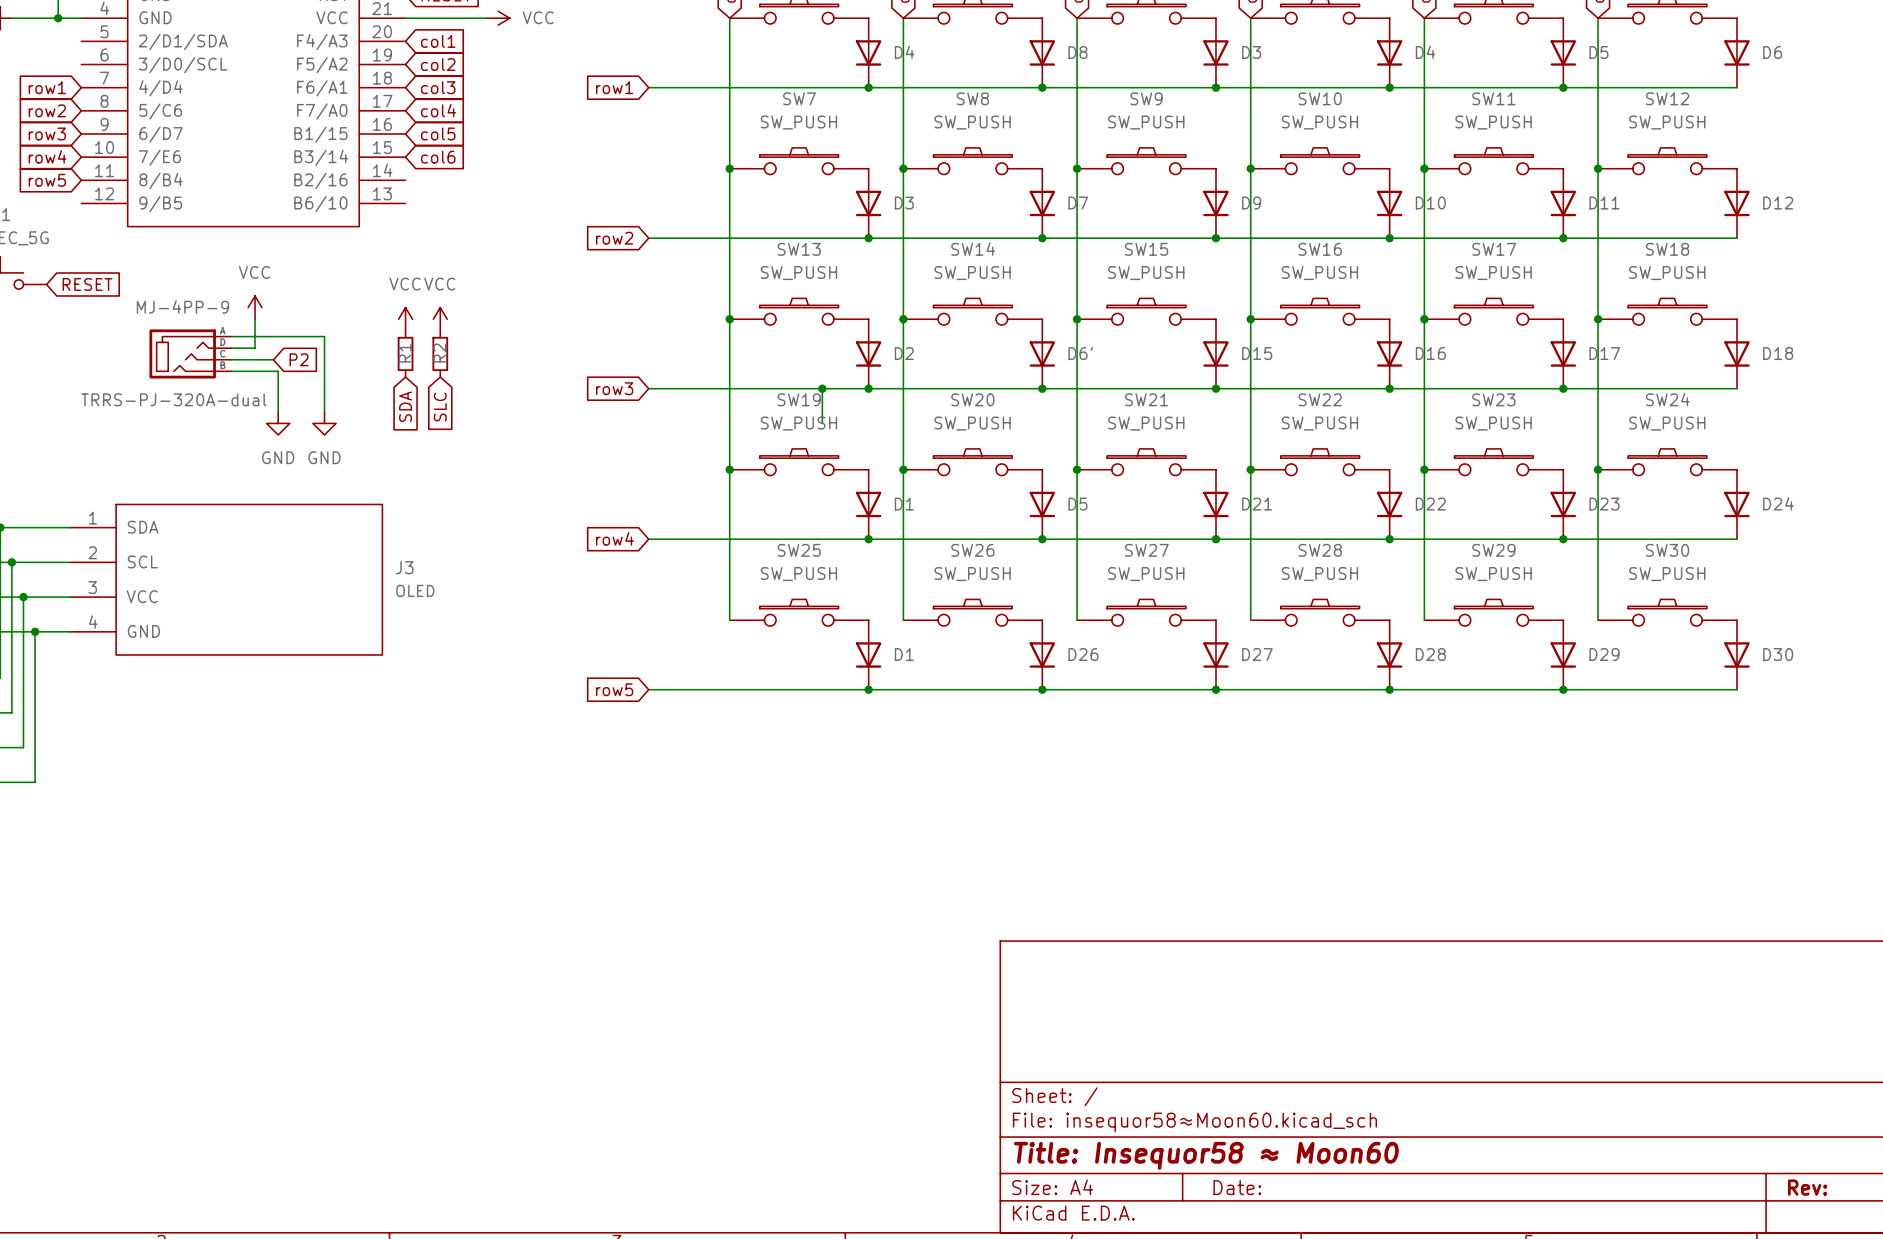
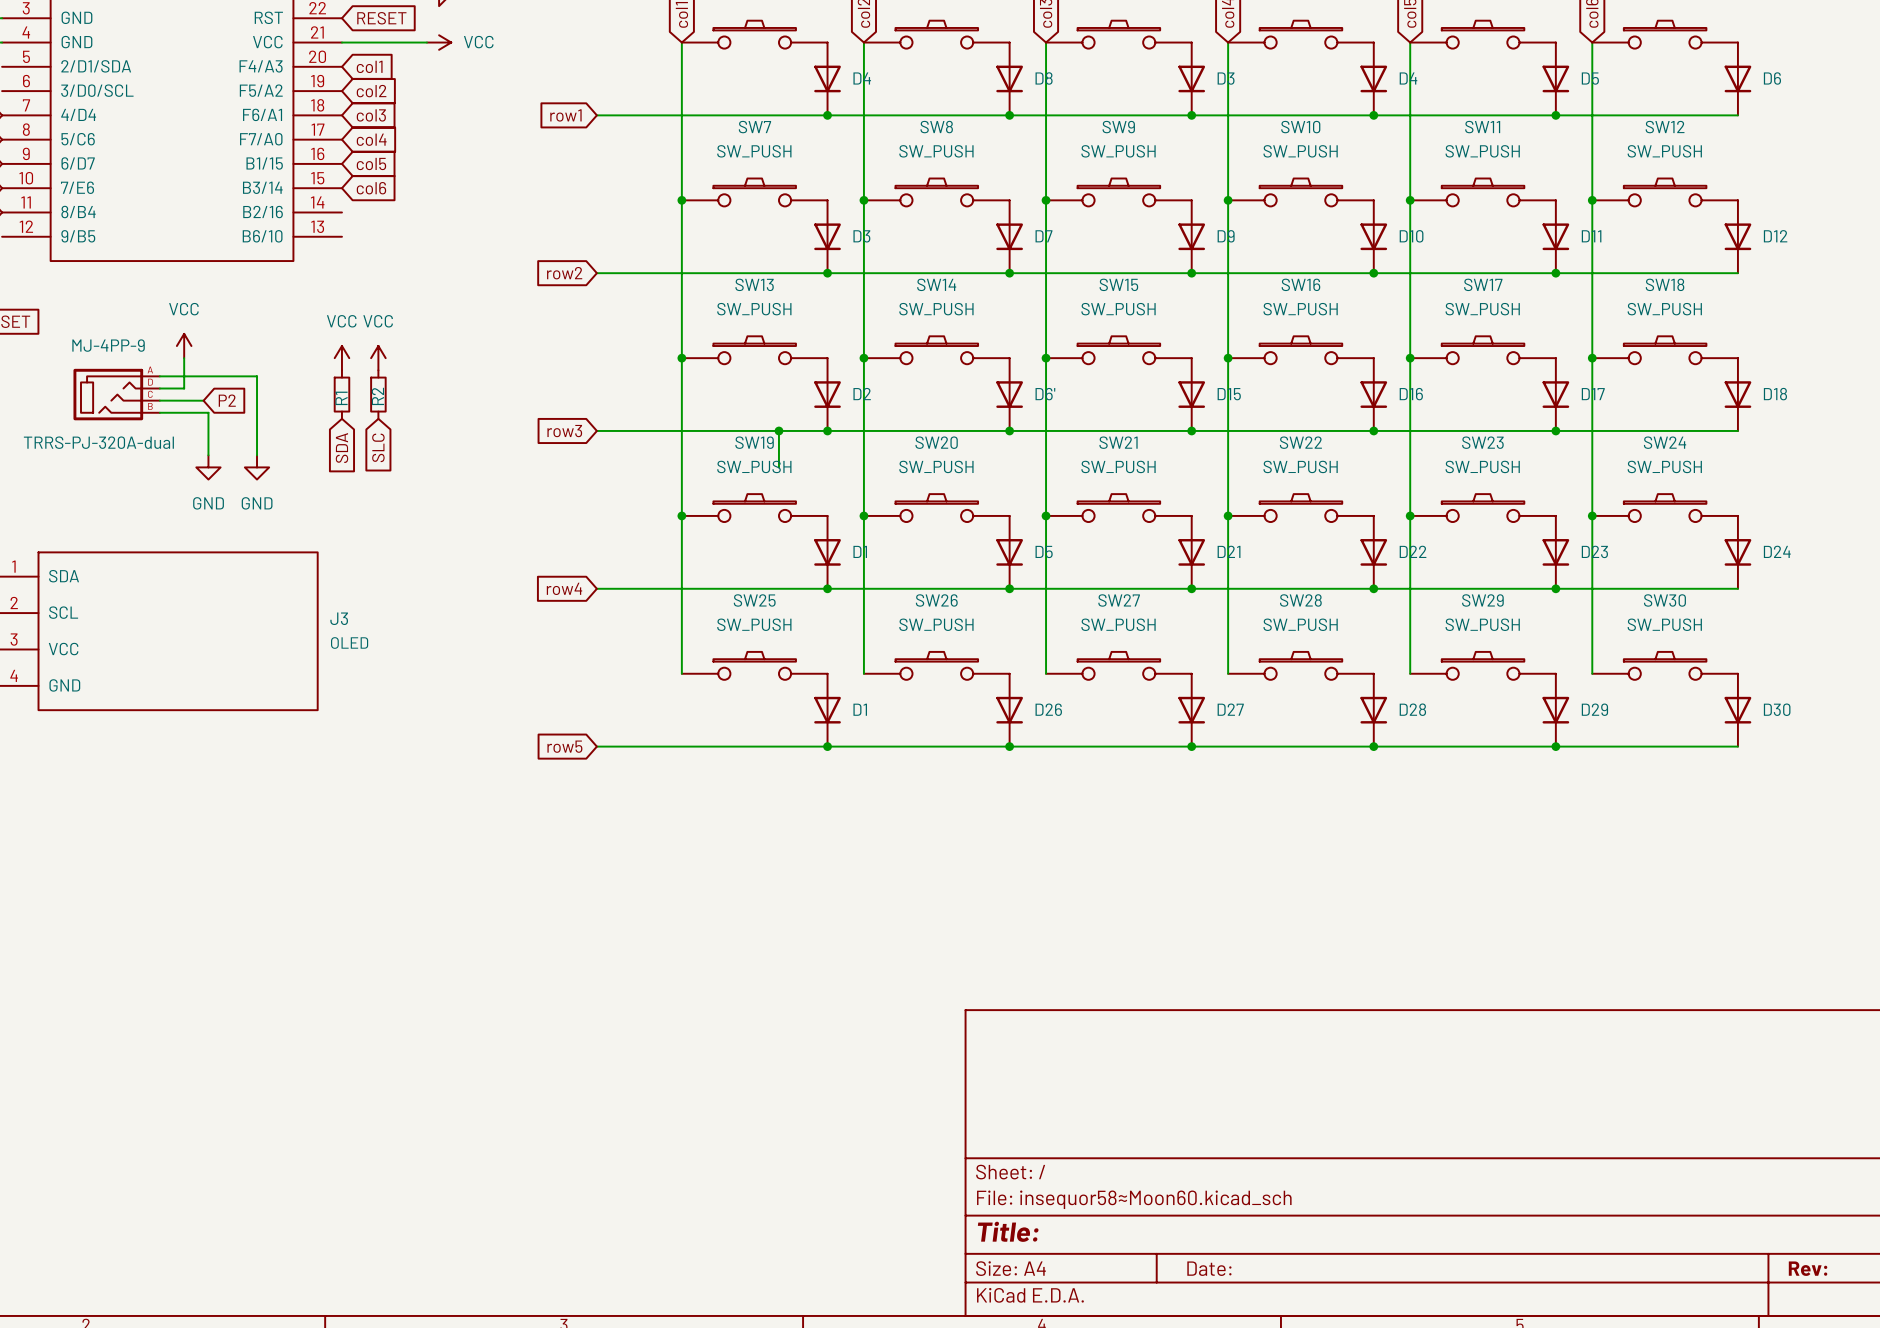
title block: Title: Insequor58 ≈ Moon60 (1206, 1155) -> Title: (1008, 1231)

